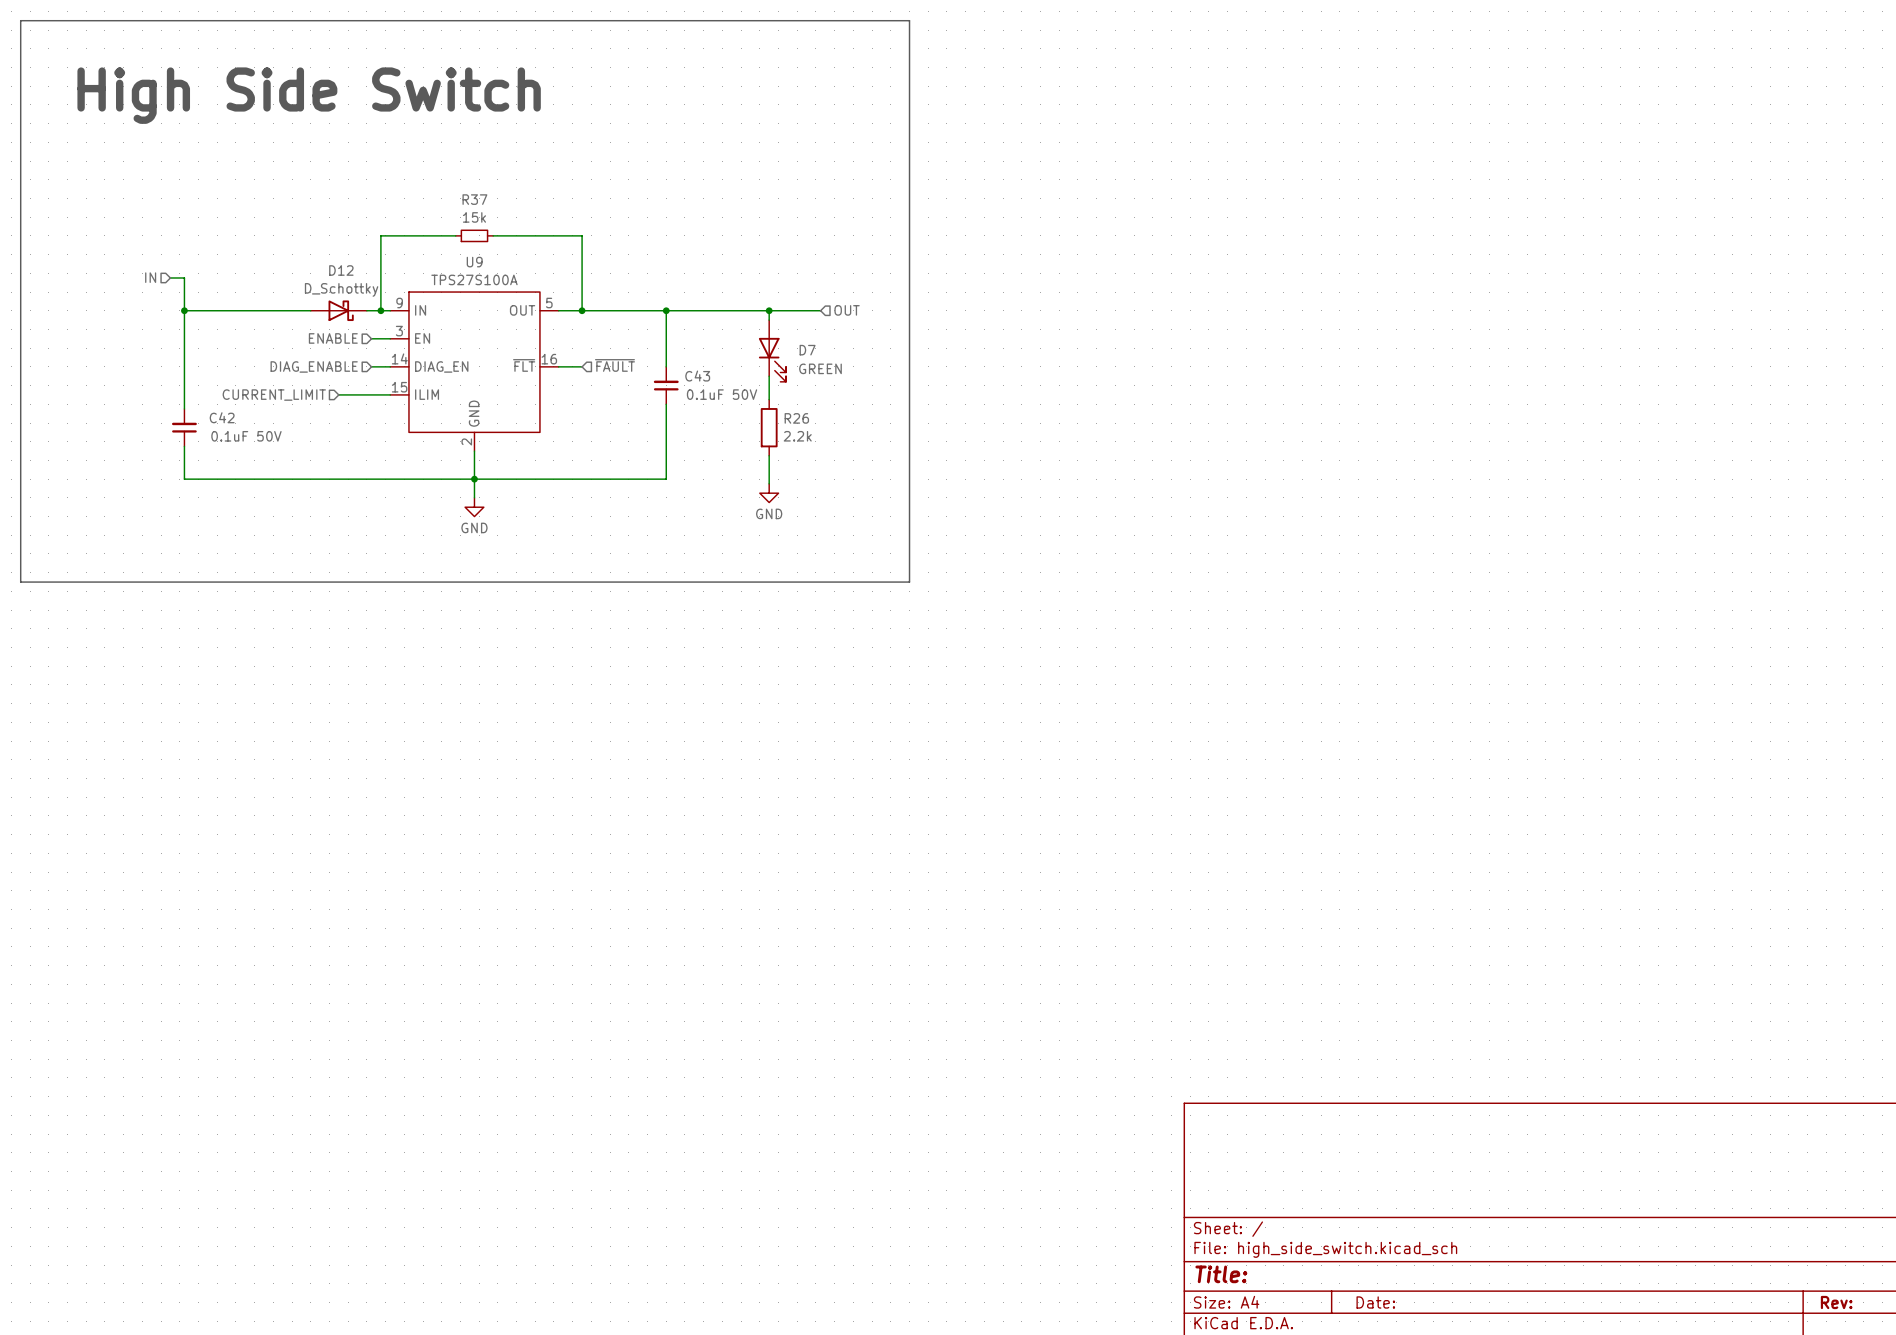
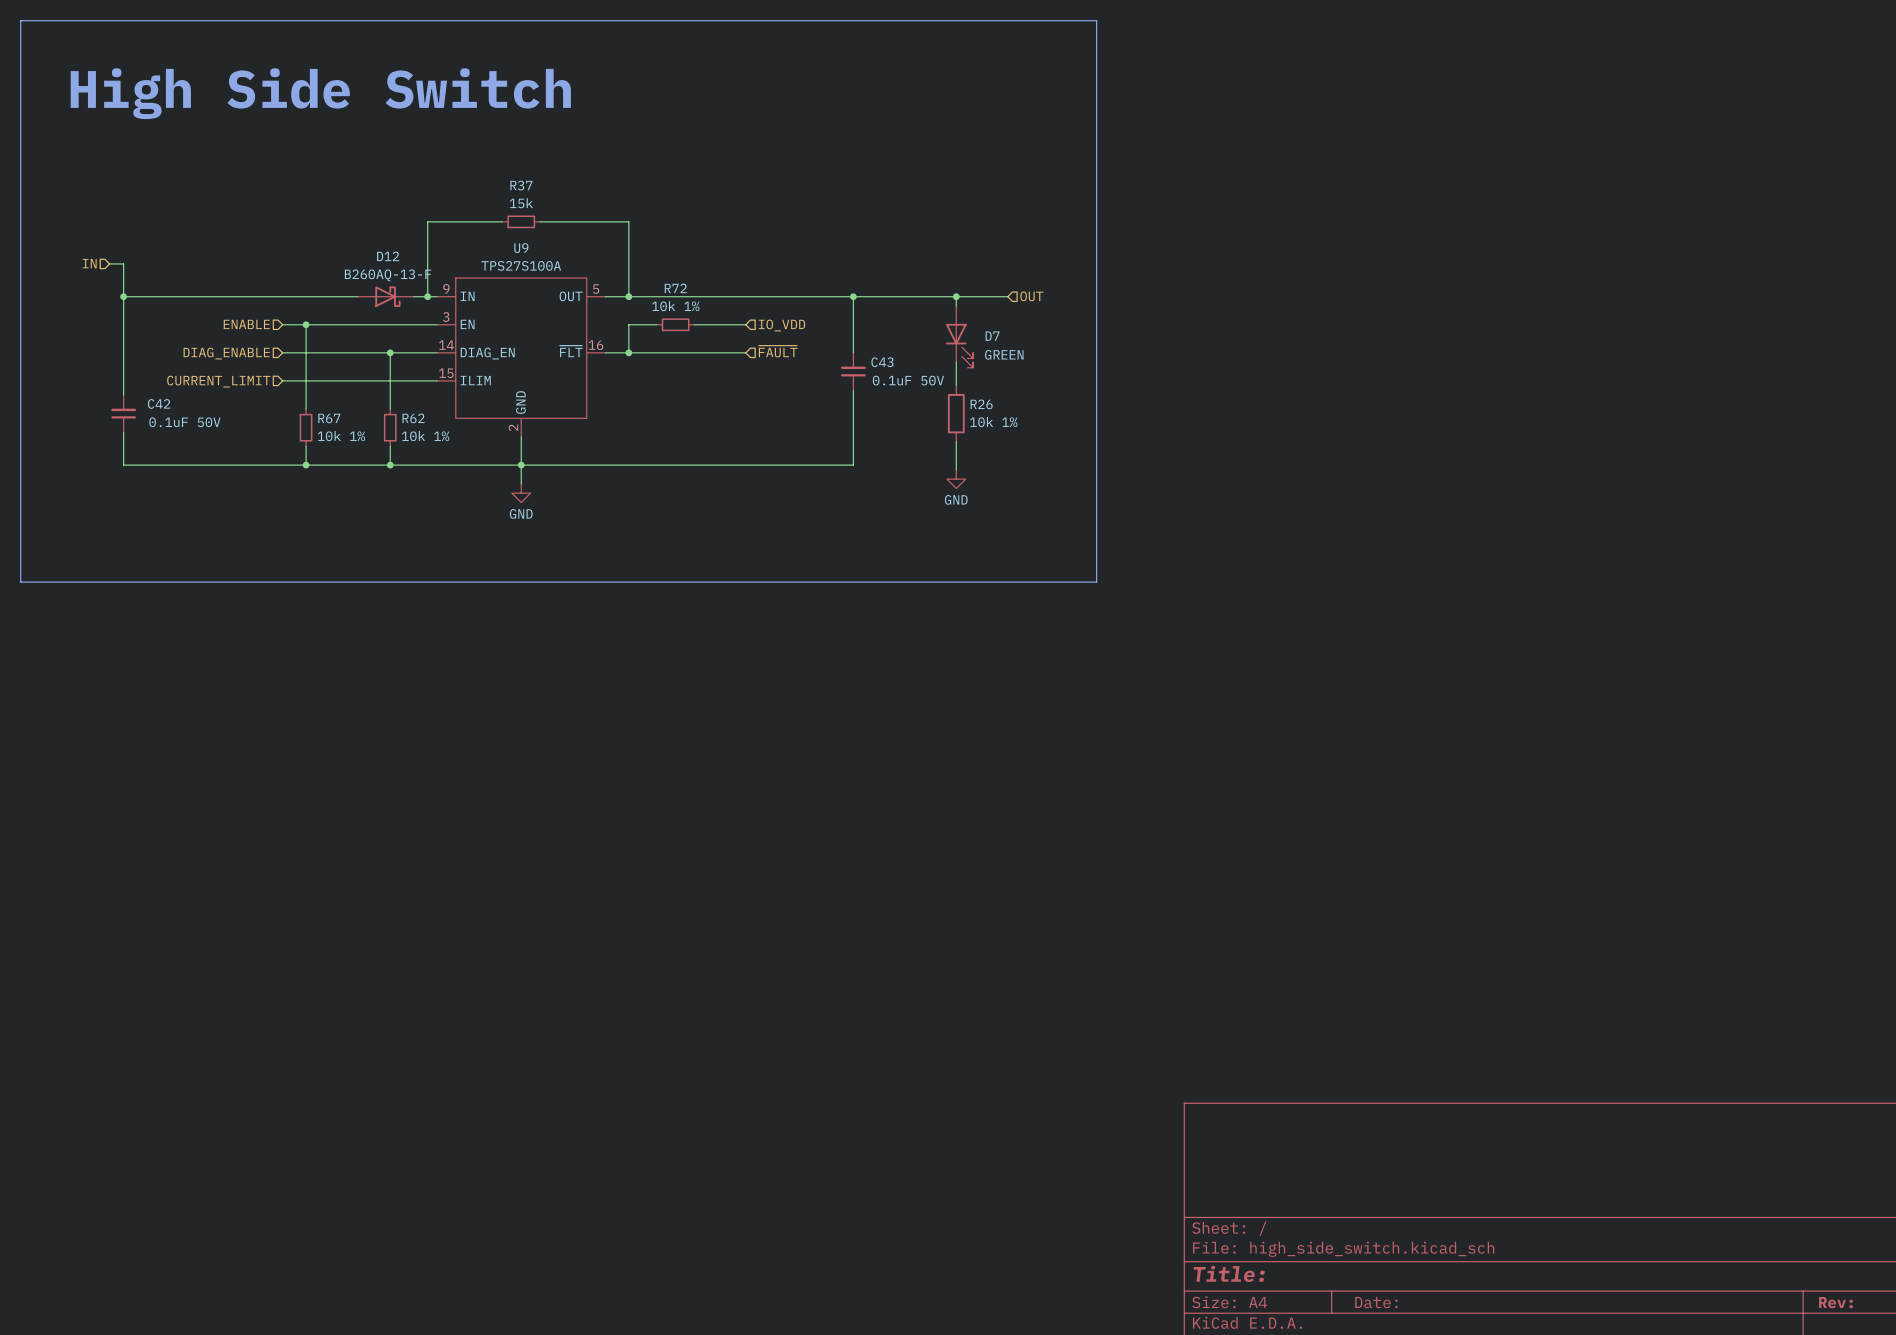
line: (909, 20) (909, 582) -> (909, 20) (1096, 20) (1096, 582) (909, 582)
wire: (455, 235) (380, 235) (380, 310) -> (502, 221) (427, 221) (427, 296)
R37 position: (474, 235) -> (521, 221)
wire: (493, 235) (582, 235) (582, 310) -> (539, 221) (628, 221) (628, 296)
hierarchical label position: IN (150, 277) -> IN (89, 263)
wire: (170, 277) (184, 277) (184, 408) -> (109, 263) (123, 263) (123, 394)
D12 value: D_Schottky (341, 289) -> B260AQ-13-F (388, 275)
wire: none -> (123, 296) (357, 296)
junction: none -> (123, 296)
junction: none -> (427, 296)
wire: none -> (605, 296) (1007, 296)
junction: none -> (628, 296)
wire: none -> (853, 296) (853, 352)
junction: none -> (853, 296)
wire: none -> (956, 296) (956, 306)
junction: none -> (956, 296)
hierarchical label: none -> OUT (1031, 296)
wire: (184, 310) (310, 310) -> none
junction: (184, 310) -> none
D12 position: (338, 310) -> (385, 296)
wire: (366, 310) (390, 310) -> (413, 296) (437, 296)
junction: (380, 310) -> none
wire: (558, 310) (820, 310) -> none
junction: (582, 310) -> none
wire: (666, 310) (666, 366) -> none
junction: (666, 310) -> none
wire: (769, 310) (769, 320) -> none
junction: (769, 310) -> none
hierarchical label: OUT (847, 310) -> none
wire: none -> (282, 324) (437, 324)
wire: none -> (306, 324) (306, 408)
junction: none -> (306, 324)
wire: none -> (656, 324) (628, 324) (628, 352)
R72: none -> 10k 1% (675, 324)
wire: none -> (694, 324) (745, 324)
hierarchical label: none -> IO_VDD (781, 325)
hierarchical label position: ENABLE (333, 338) -> ENABLE (246, 324)
wire: (371, 338) (390, 338) -> none
D7 position: (772, 350) -> (959, 336)
wire: none -> (282, 352) (437, 352)
wire: none -> (390, 352) (390, 408)
junction: none -> (390, 352)
wire: none -> (605, 352) (745, 352)
junction: none -> (628, 352)
wire: none -> (956, 362) (956, 385)
hierarchical label position: ~{FAULT} (614, 365) -> ~{FAULT} (778, 351)
hierarchical label position: DIAG_ENABLE (314, 366) -> DIAG_ENABLE (226, 353)
wire: (371, 366) (390, 366) -> none
wire: (558, 366) (582, 366) -> none
U9 position: (474, 371) -> (521, 357)
wire: (769, 376) (769, 399) -> none
wire: none -> (282, 380) (437, 380)
C43 position: (666, 385) -> (853, 371)
wire: none -> (853, 390) (853, 465) (123, 465) (123, 432)
wire: (338, 394) (390, 394) -> none
hierarchical label position: CURRENT_LIMIT (274, 395) -> CURRENT_LIMIT (218, 381)
wire: (666, 404) (666, 479) (184, 479) (184, 446) -> none
C42 position: (184, 427) -> (123, 413)
R67: none -> 10k 1% (306, 427)
R62: none -> 10k 1% (390, 427)
R26 position: (769, 427) -> (956, 413)
R26 value: 2.2k (797, 436) -> 10k 1% (993, 422)
wire: none -> (956, 441) (956, 469)
wire: none -> (306, 446) (306, 465)
wire: none -> (390, 446) (390, 465)
wire: (474, 451) (474, 497) -> (521, 437) (521, 483)
wire: (769, 455) (769, 483) -> none
junction: none -> (306, 465)
junction: none -> (390, 465)
junction: none -> (521, 465)
junction: (474, 479) -> none
power symbol: none -> GND (956, 479)
power symbol: GND (769, 493) -> none
power symbol position: GND (474, 507) -> GND (521, 493)

